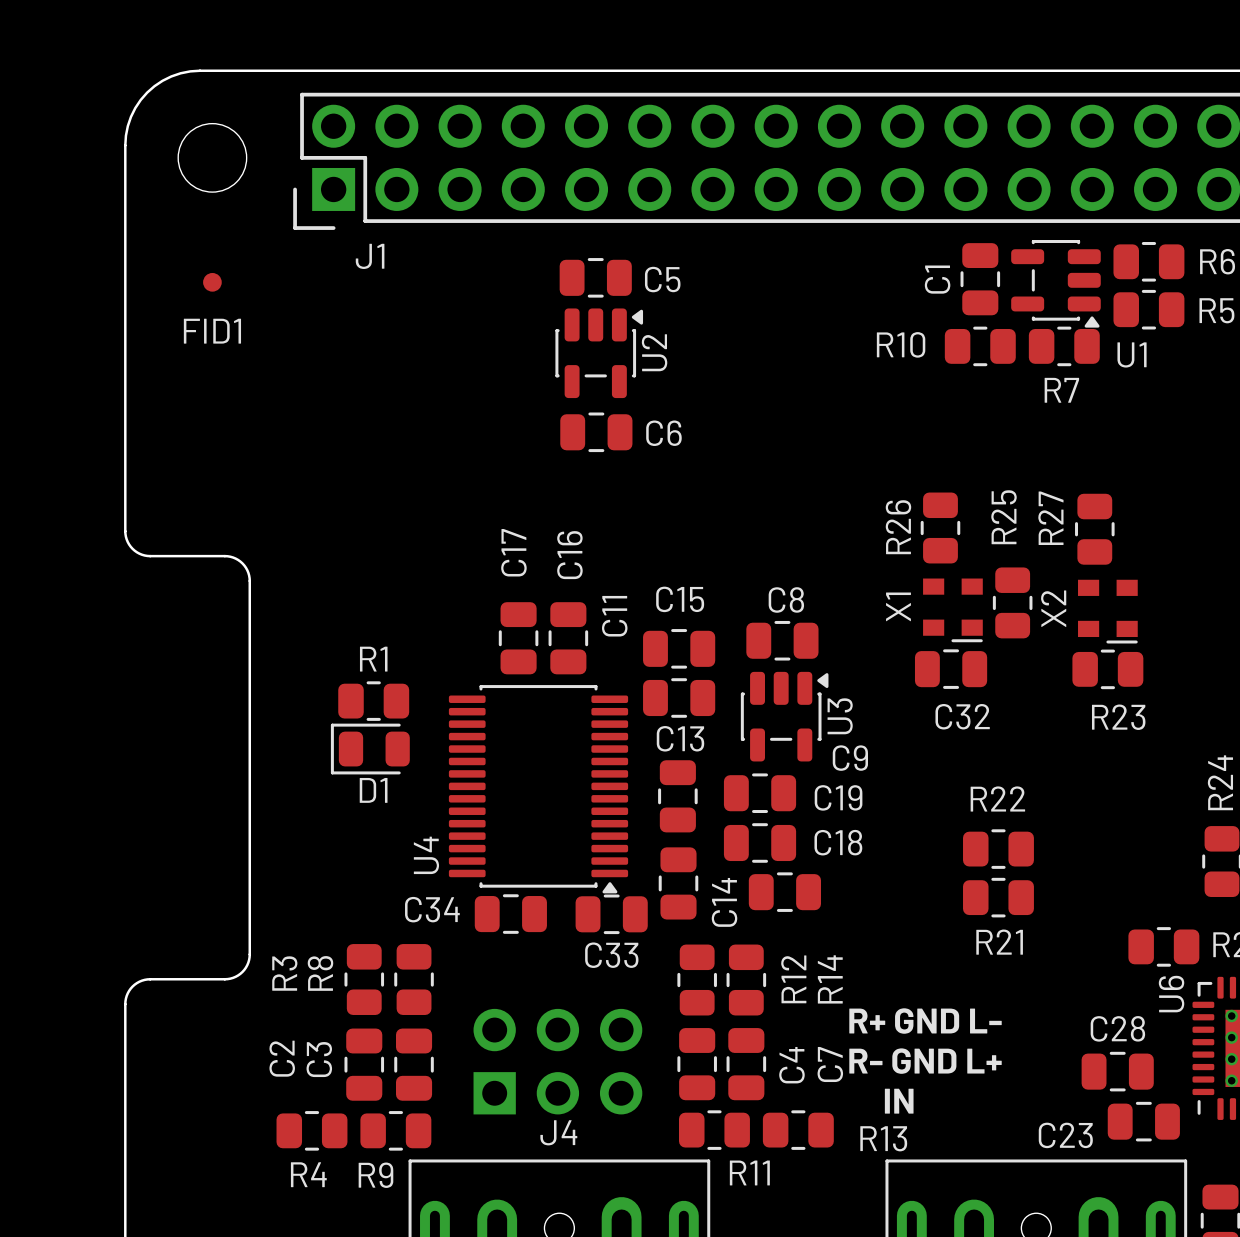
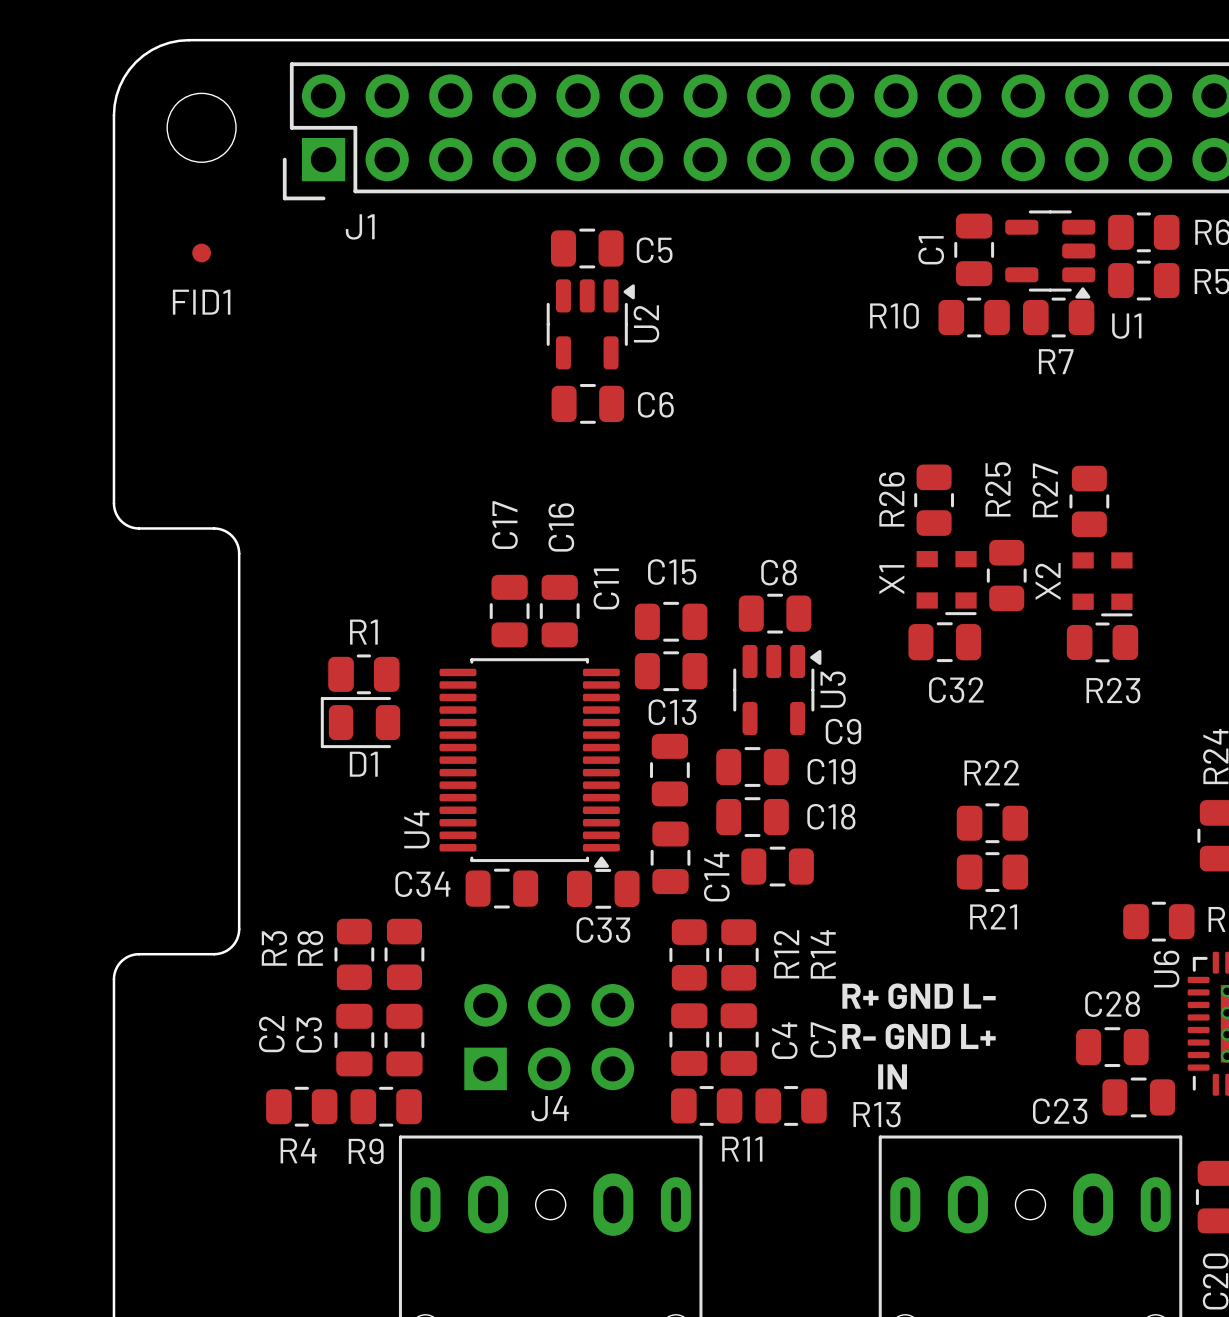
U1 footprint: [1011, 240, 1101, 328] -> [1005, 210, 1096, 299]
U2 footprint: [555, 308, 644, 399] -> [546, 279, 635, 370]
U3 footprint: [740, 671, 829, 762] -> [733, 644, 822, 736]

